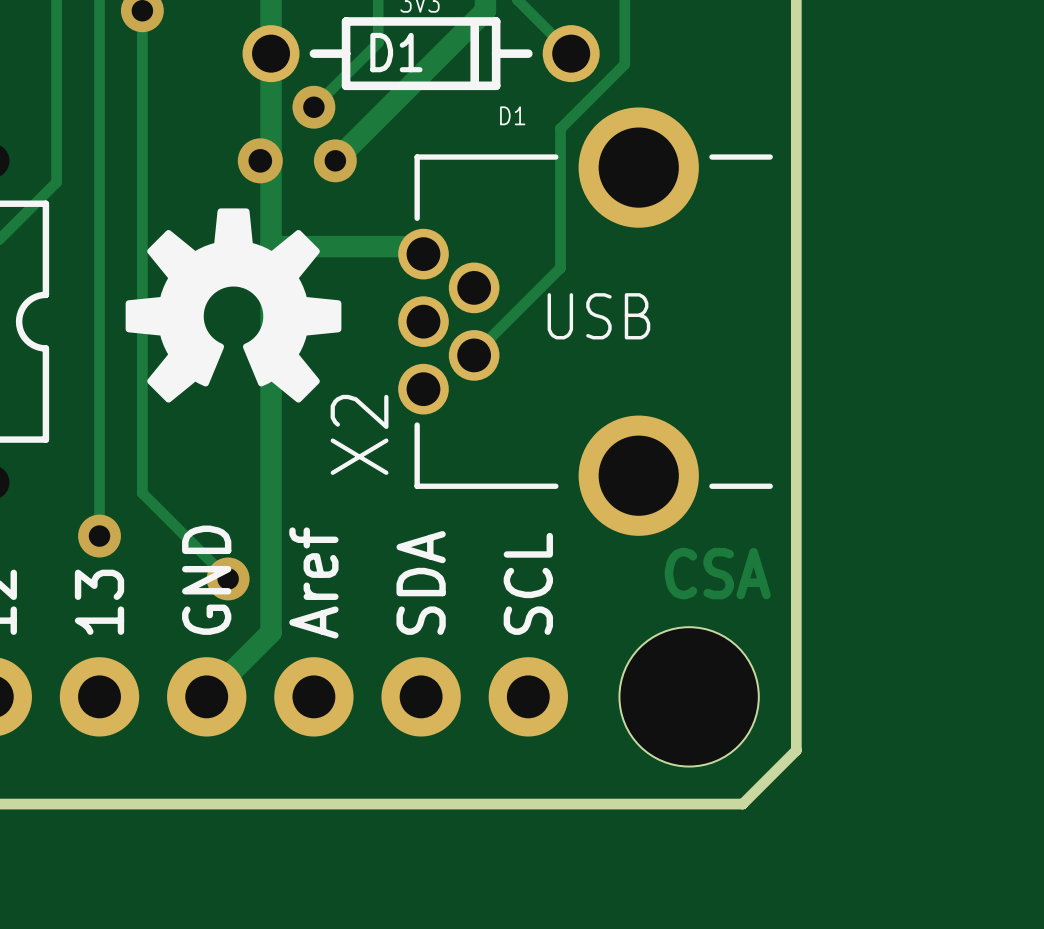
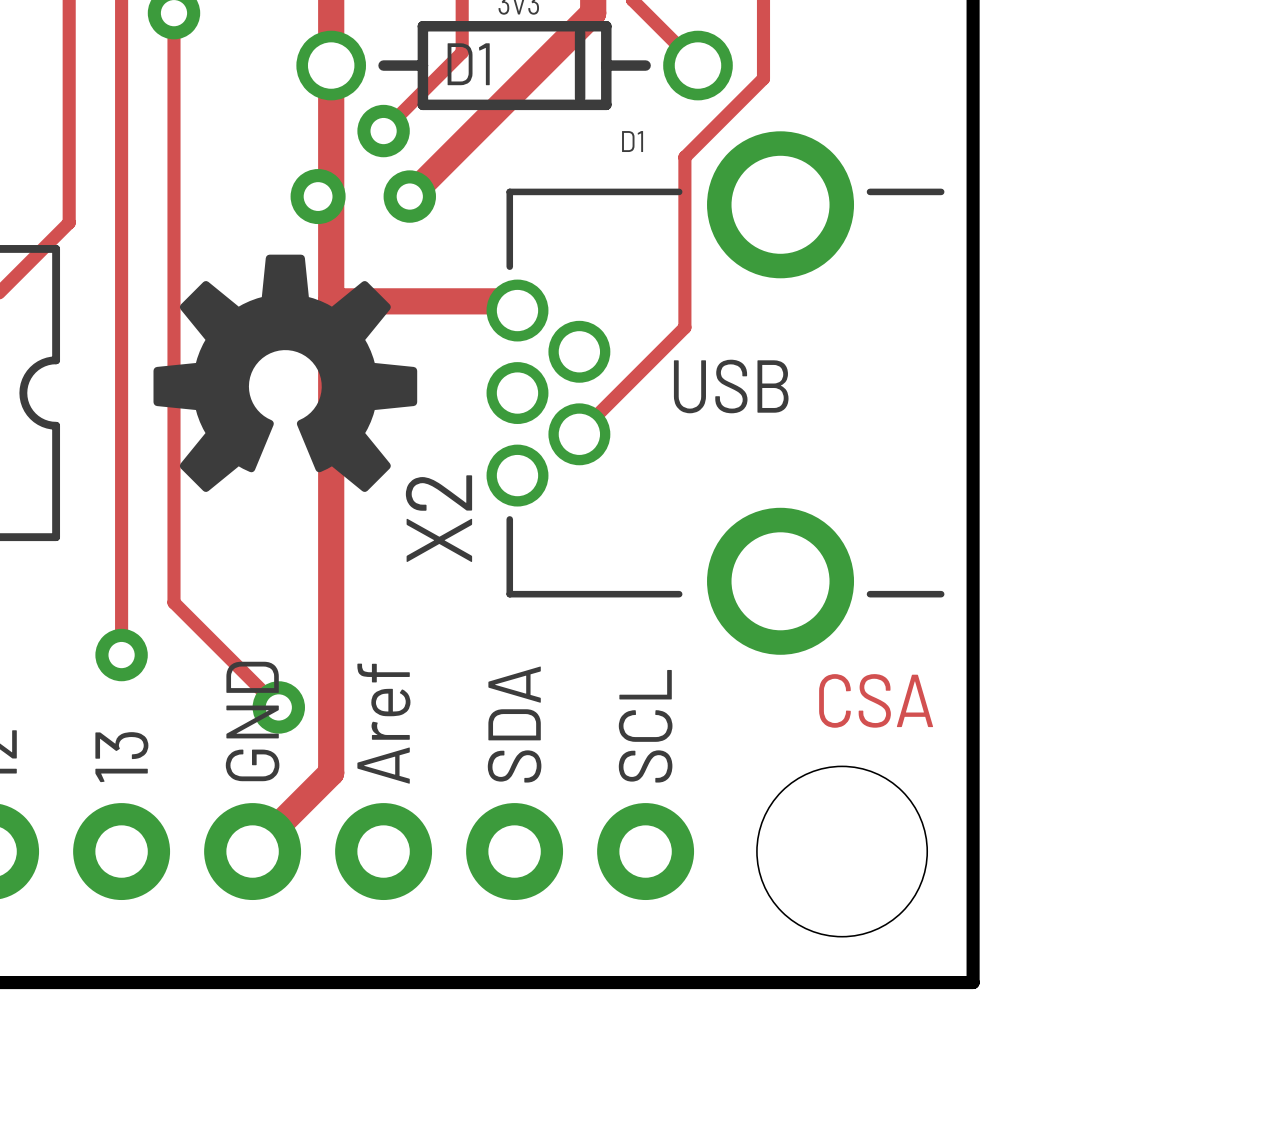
board edge: (796, 750) (742, 804) -> (973, 917) (973, 982) (907, 982)

